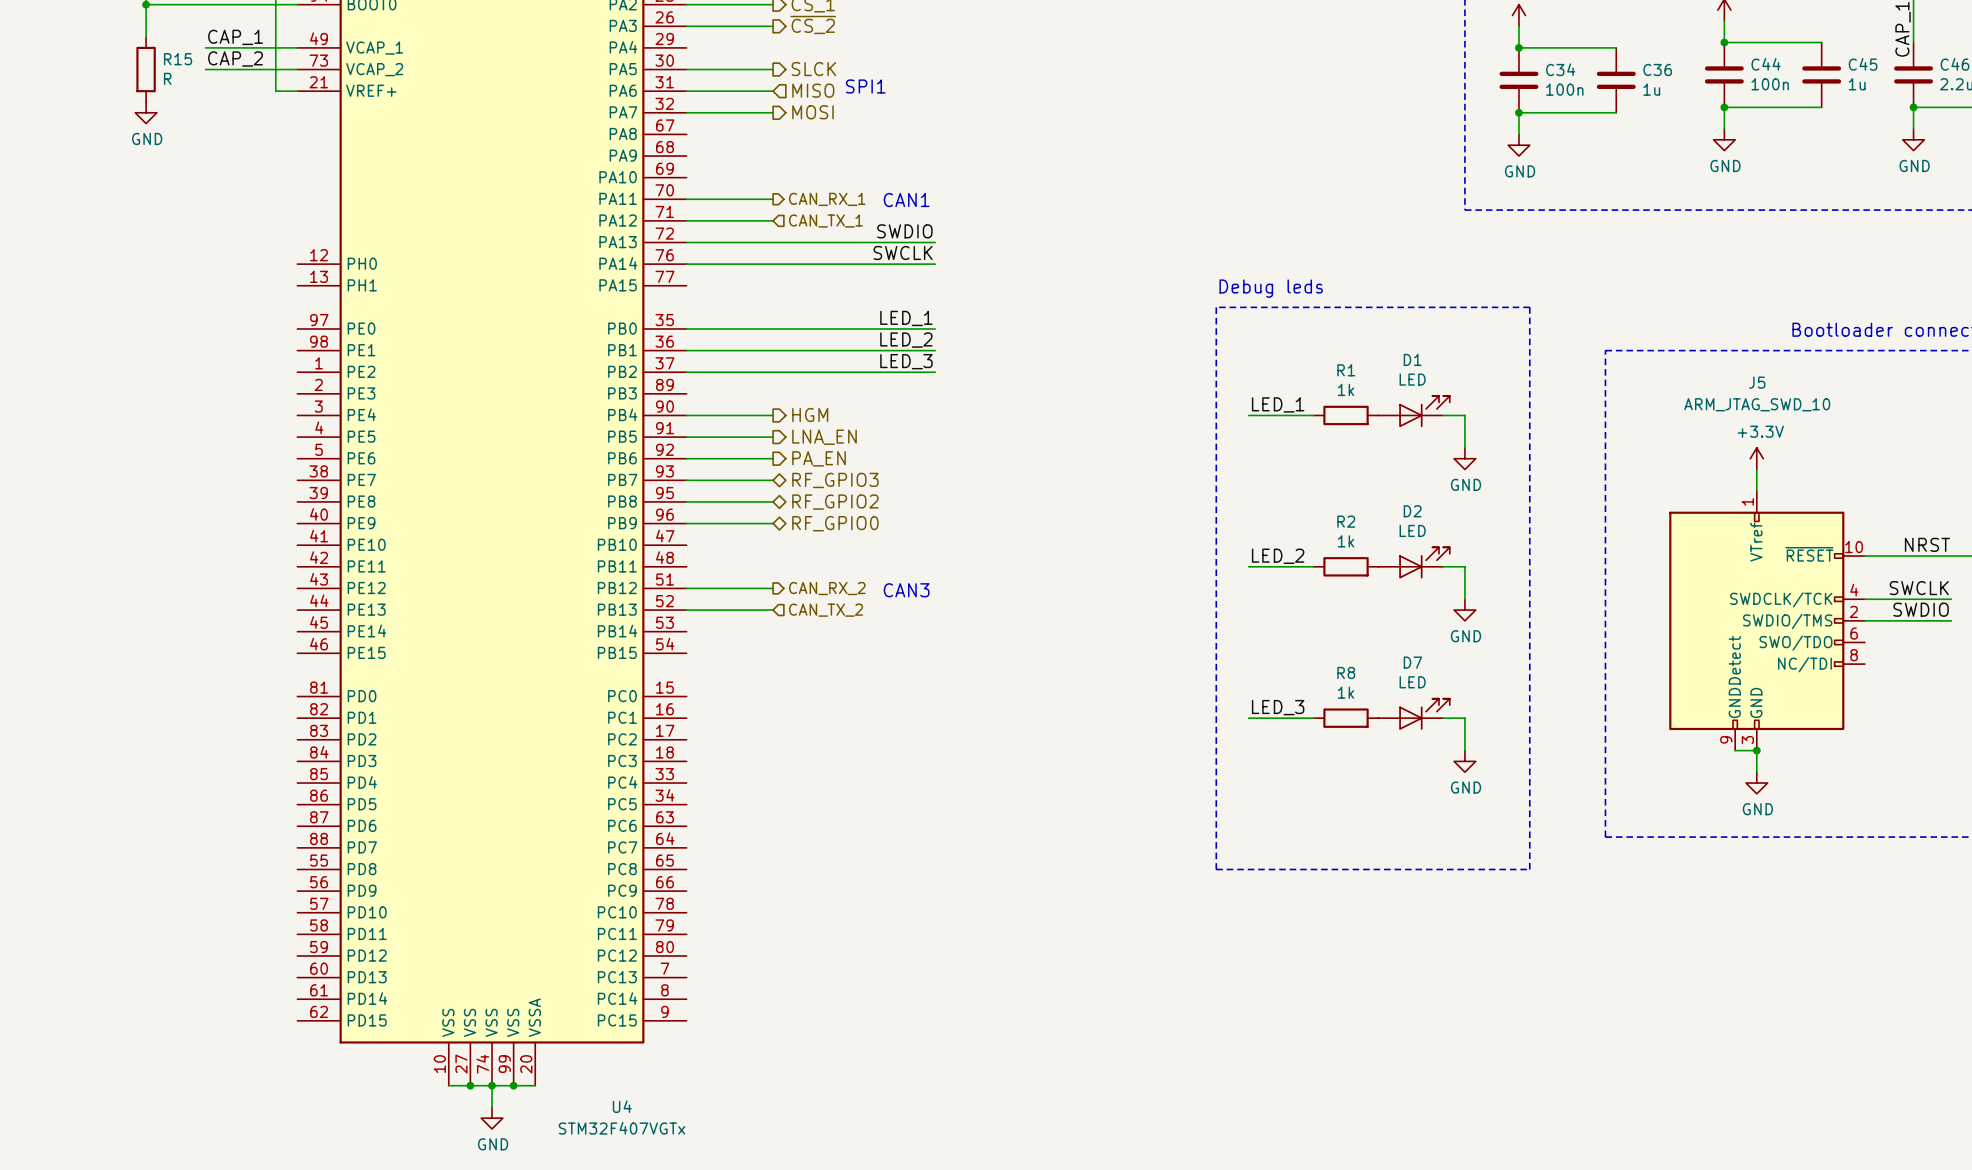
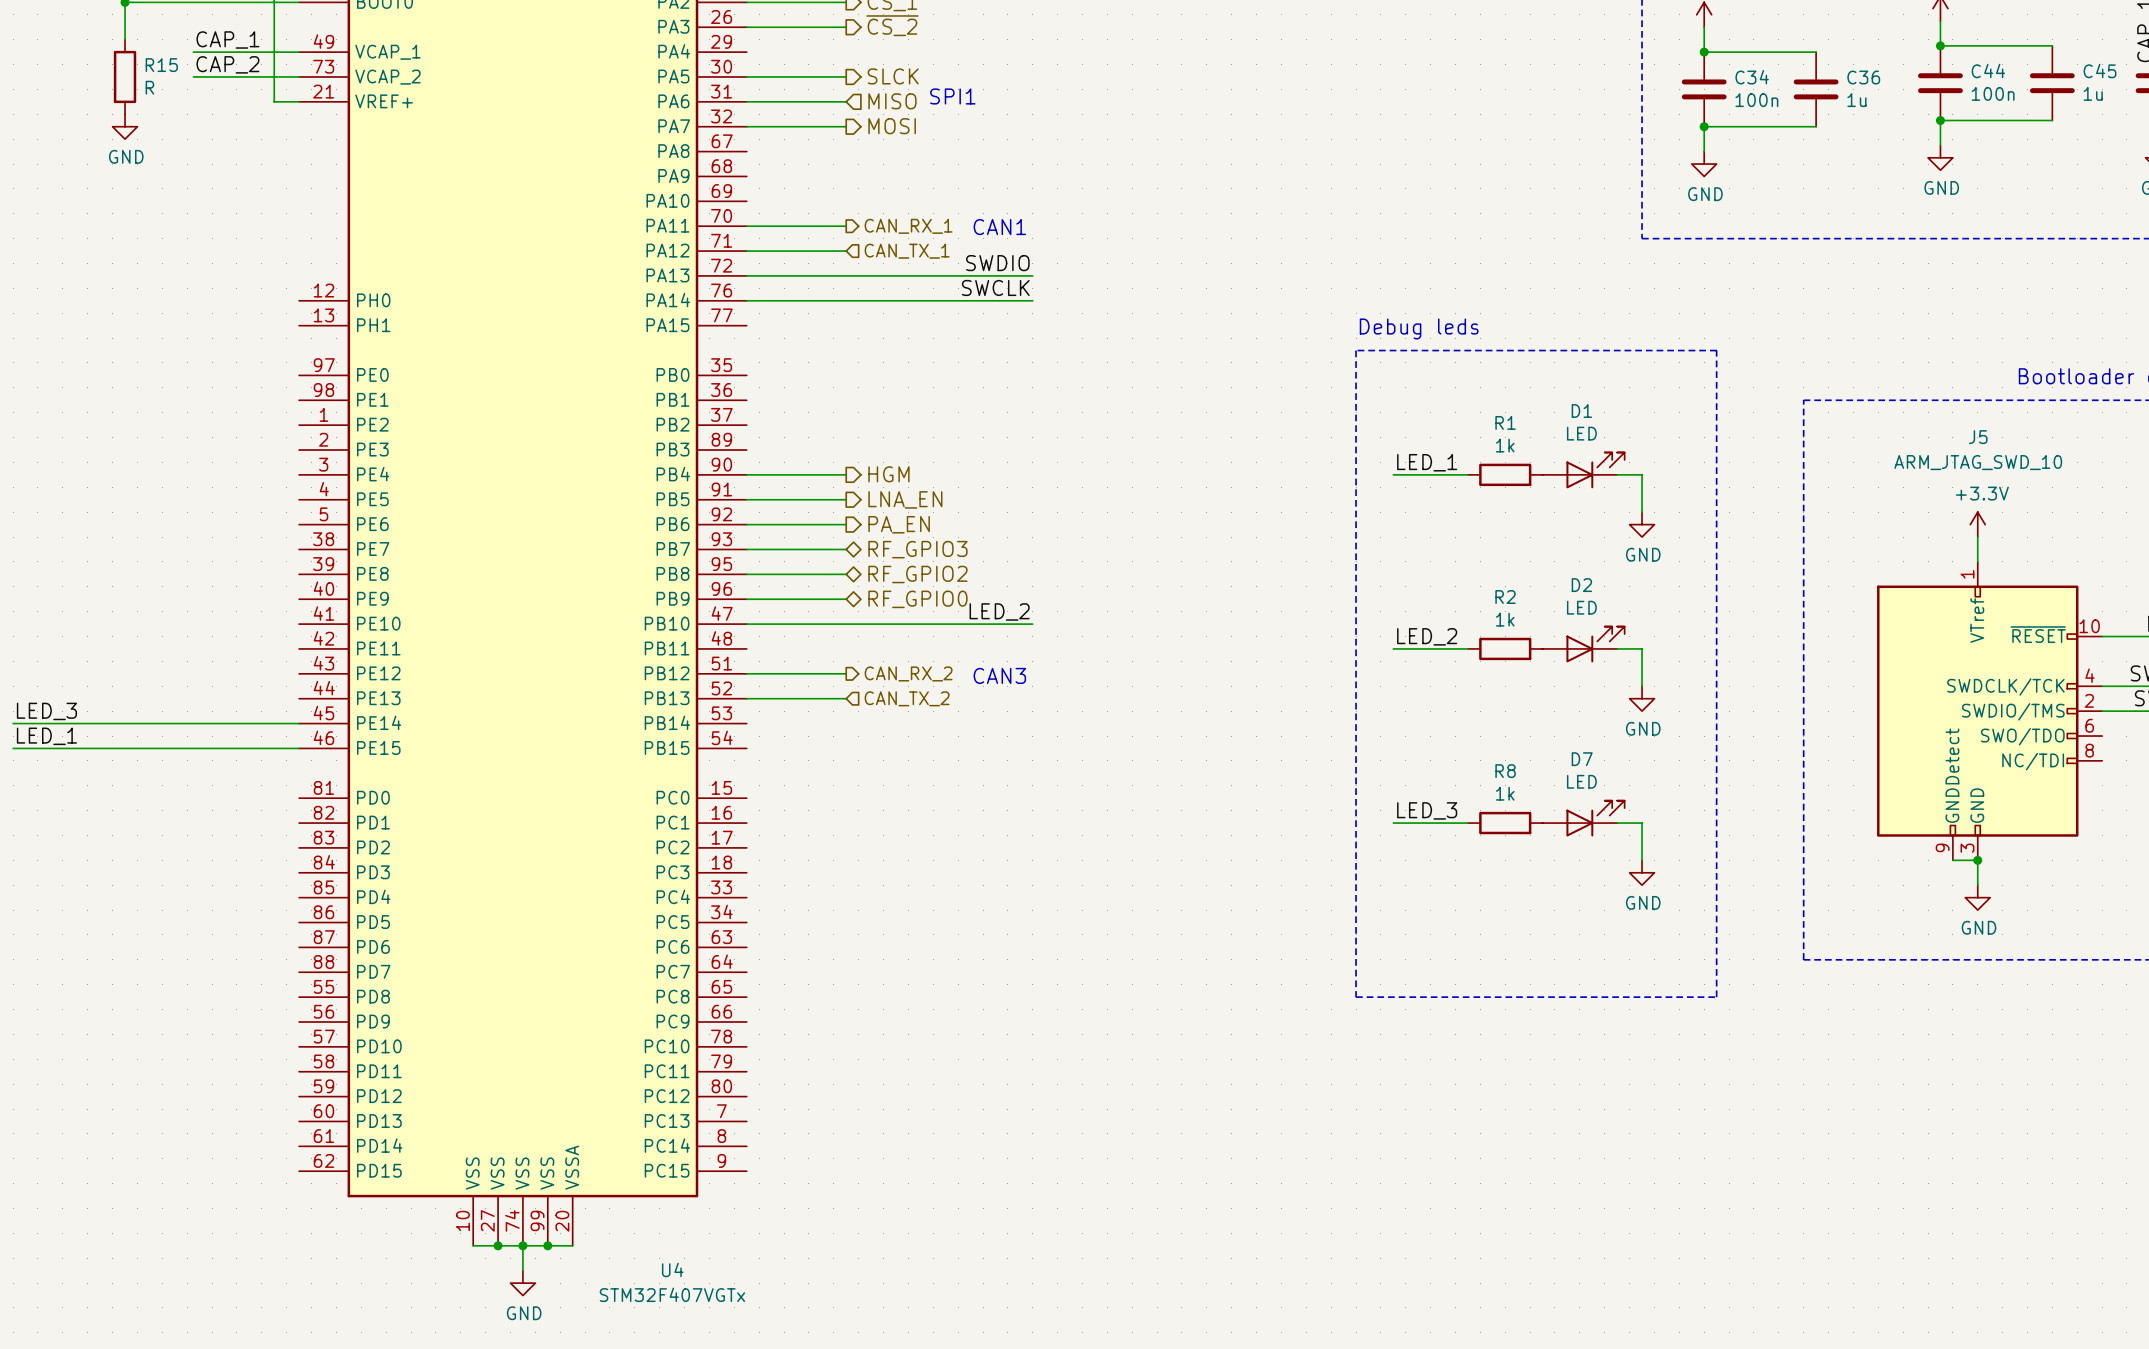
label: LED_1 (906, 318) -> none
wire: (686, 328) (935, 328) -> none
label position: LED_2 (906, 340) -> LED_2 (999, 611)
wire: (686, 350) (935, 350) -> none
label: LED_3 (906, 361) -> none
wire: (686, 372) (935, 372) -> (746, 624) (1032, 624)
label: none -> LED_3 (46, 711)
wire: none -> (13, 723) (299, 723)
label: none -> LED_1 (46, 736)
wire: none -> (13, 748) (299, 748)

